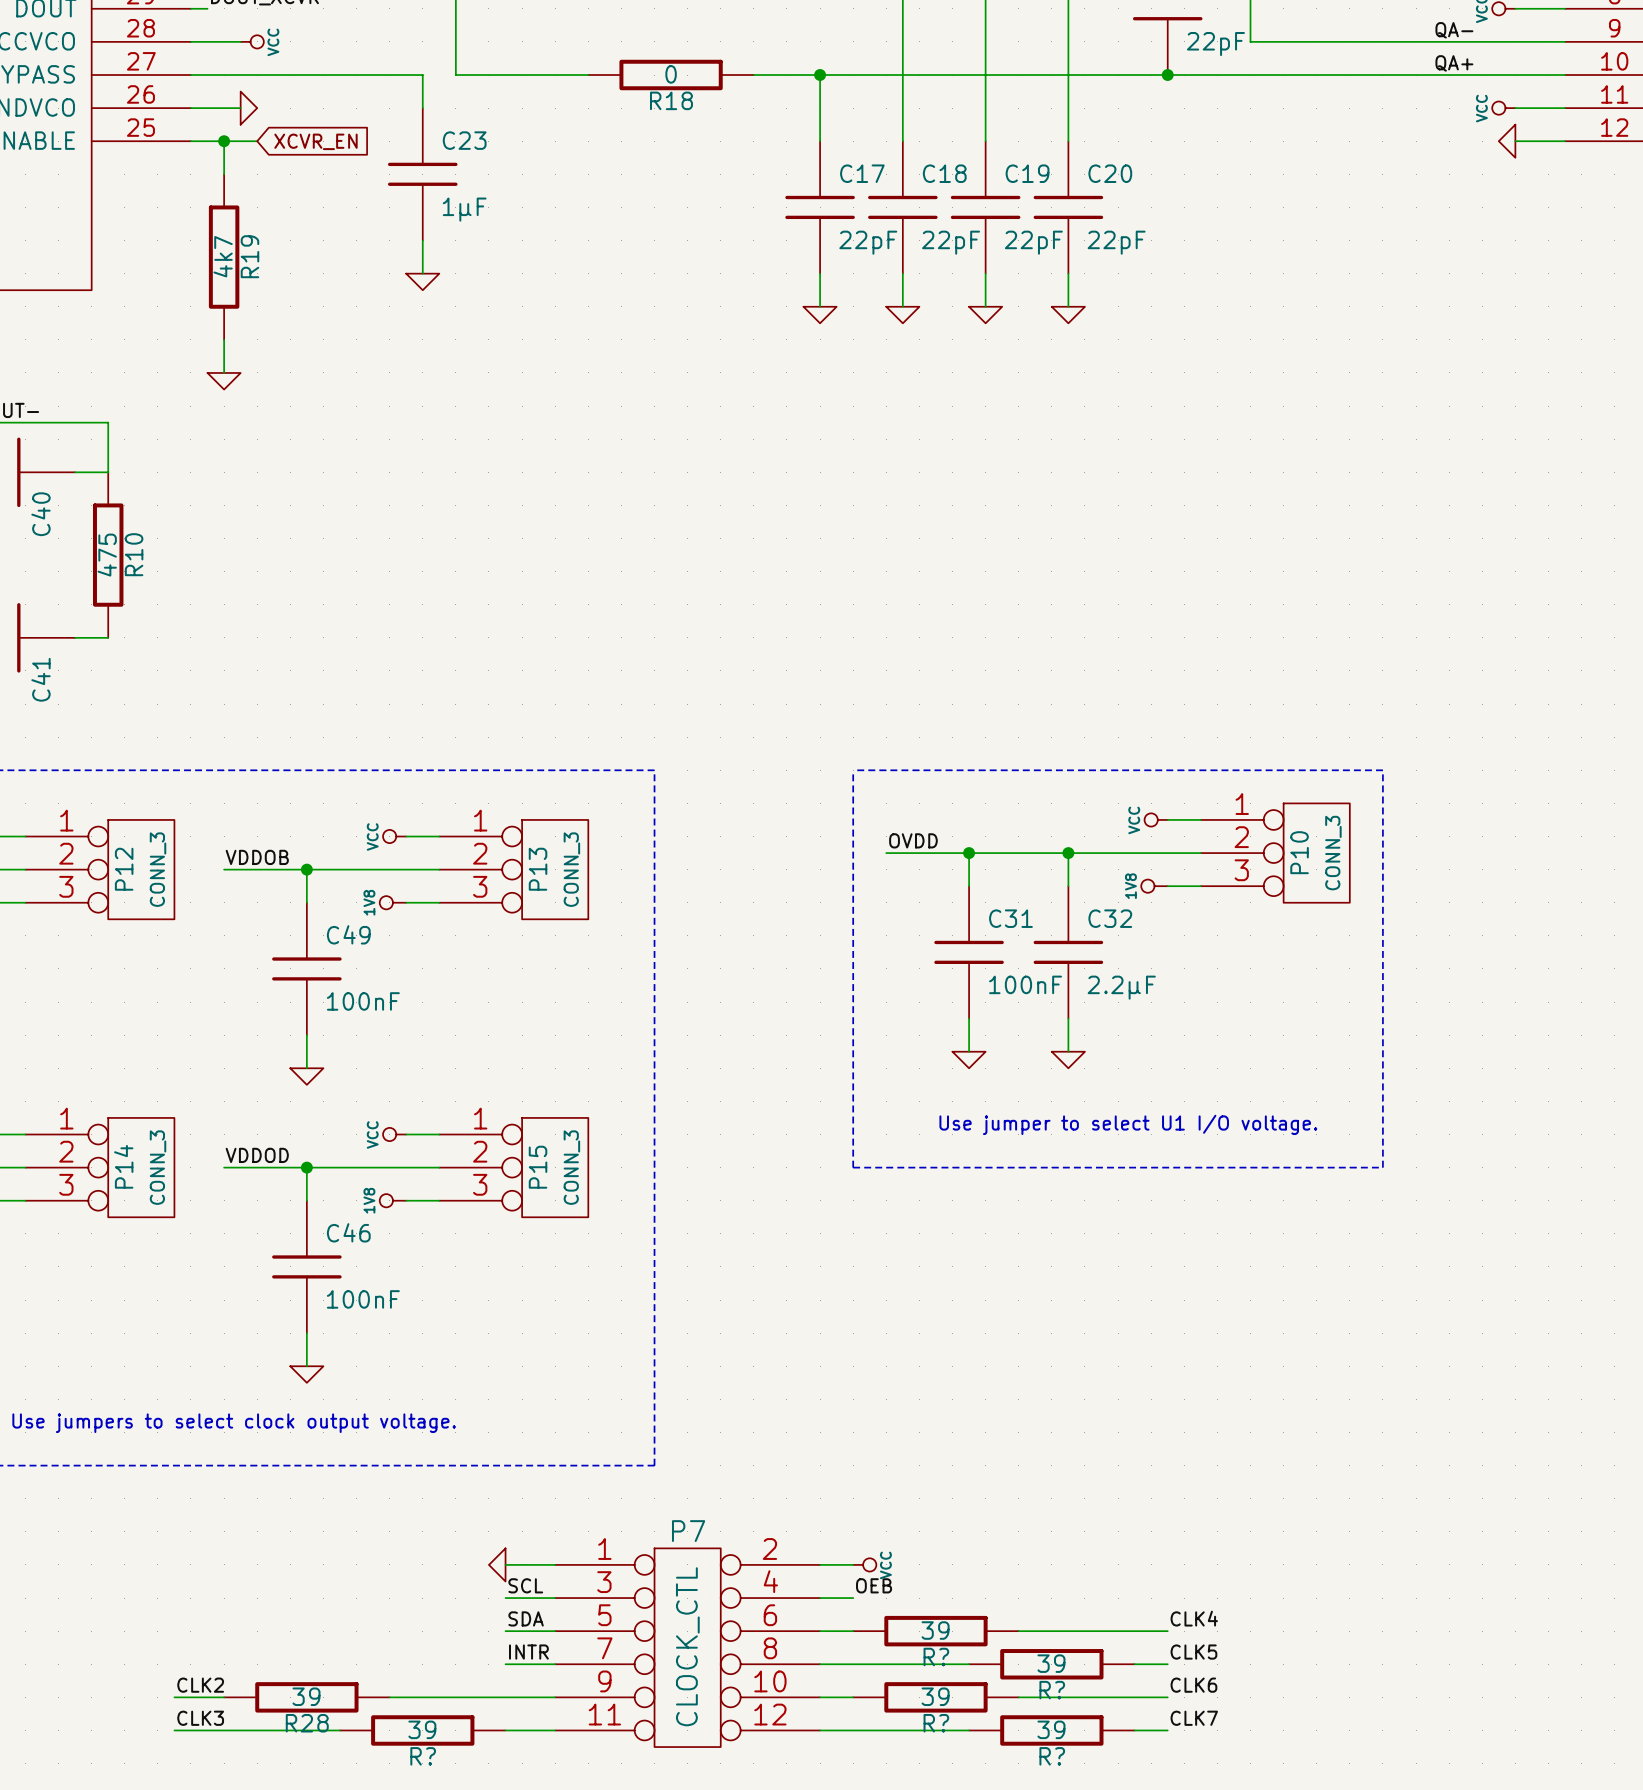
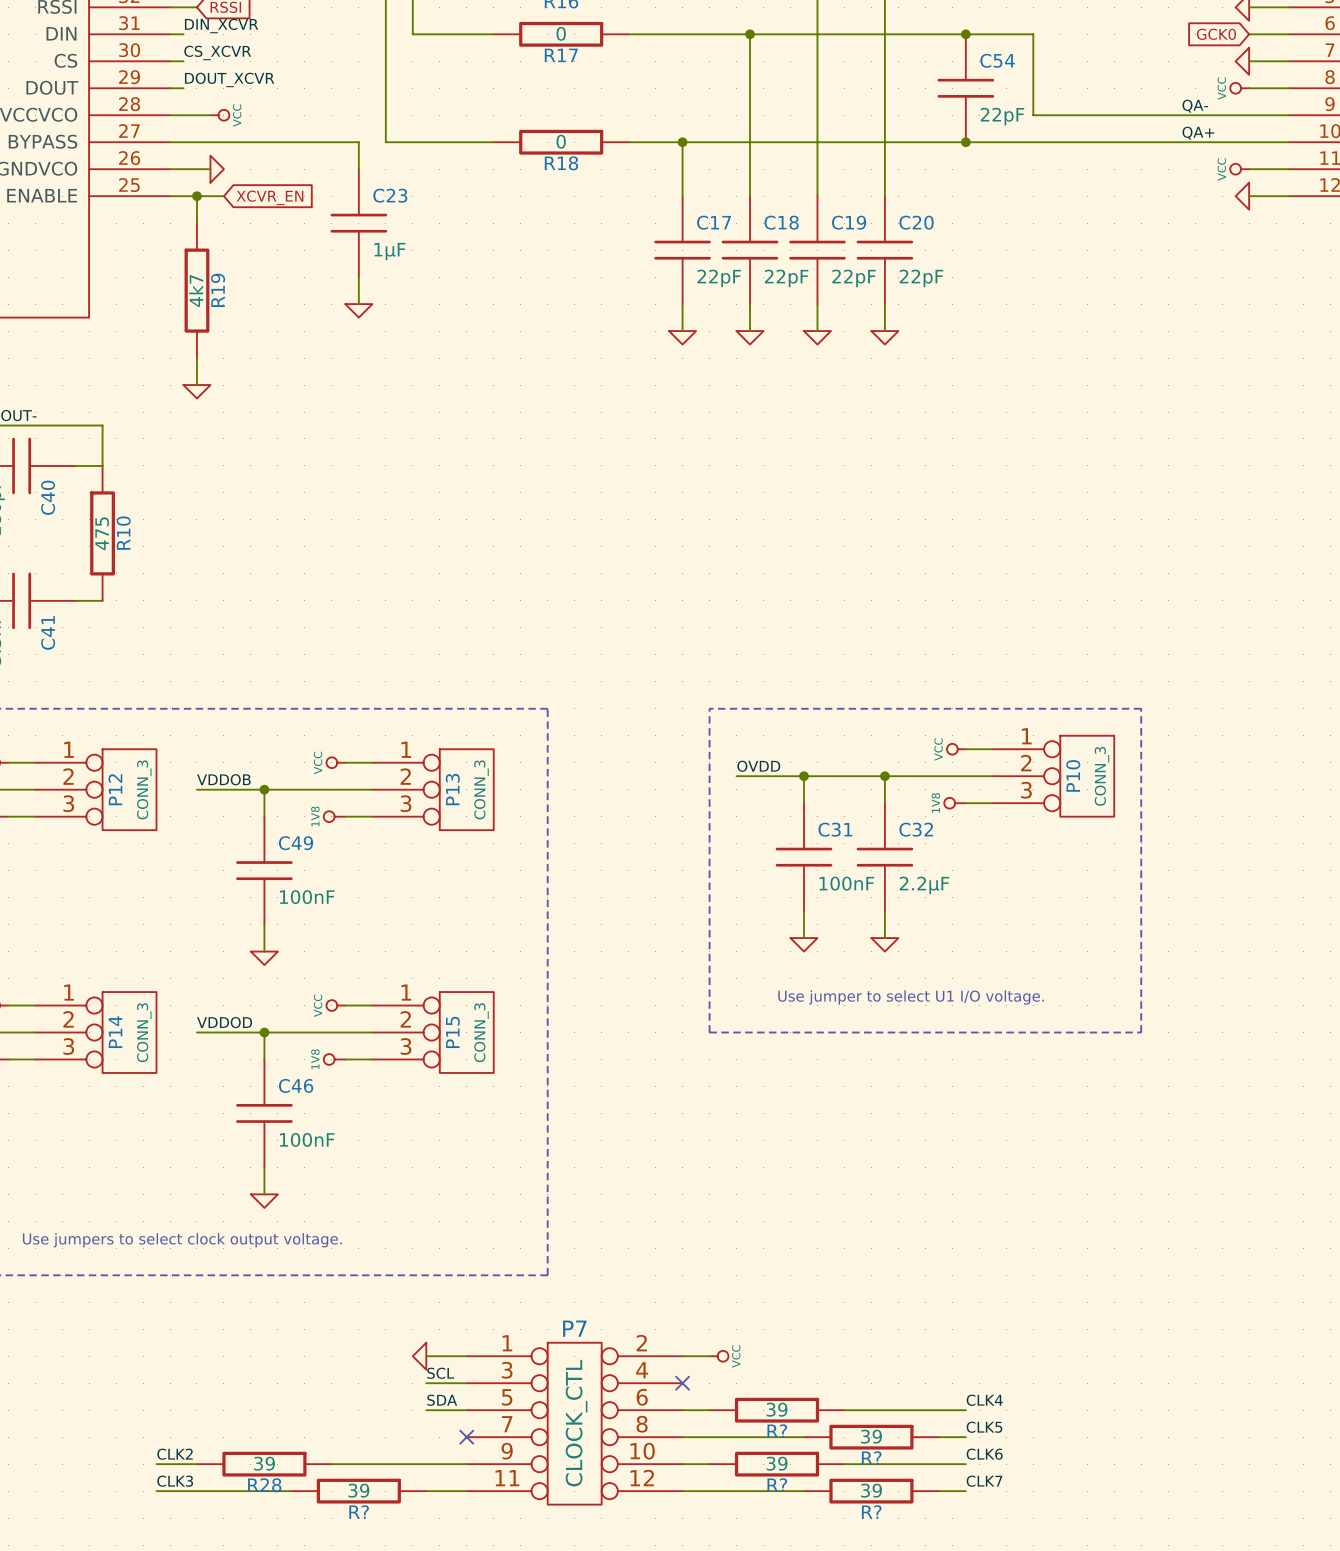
label: OEB (874, 1585) -> none
wire: (820, 1598) (853, 1598) -> none
no-connect mark: none -> (682, 1383)
label: INTR (528, 1652) -> none
wire: (505, 1664) (555, 1664) -> none
no-connect mark: none -> (466, 1437)

